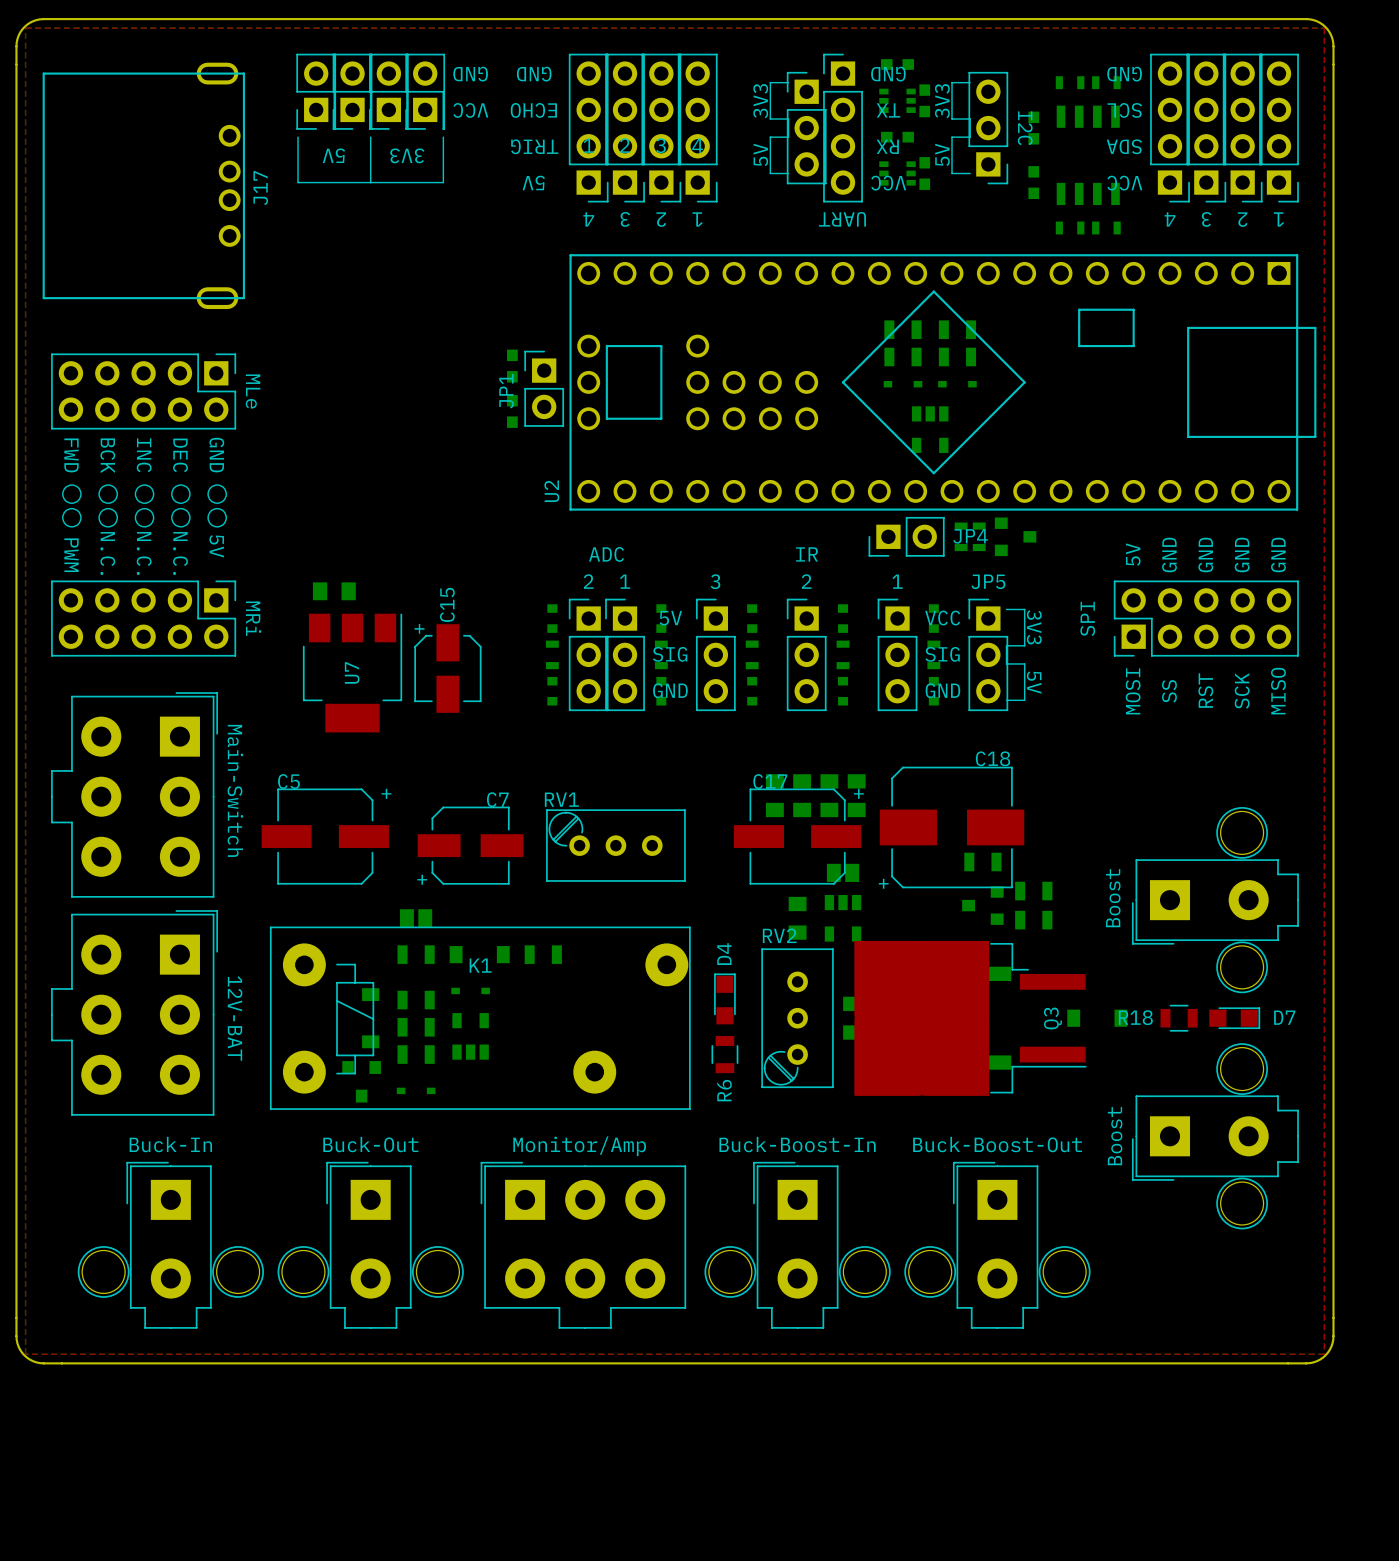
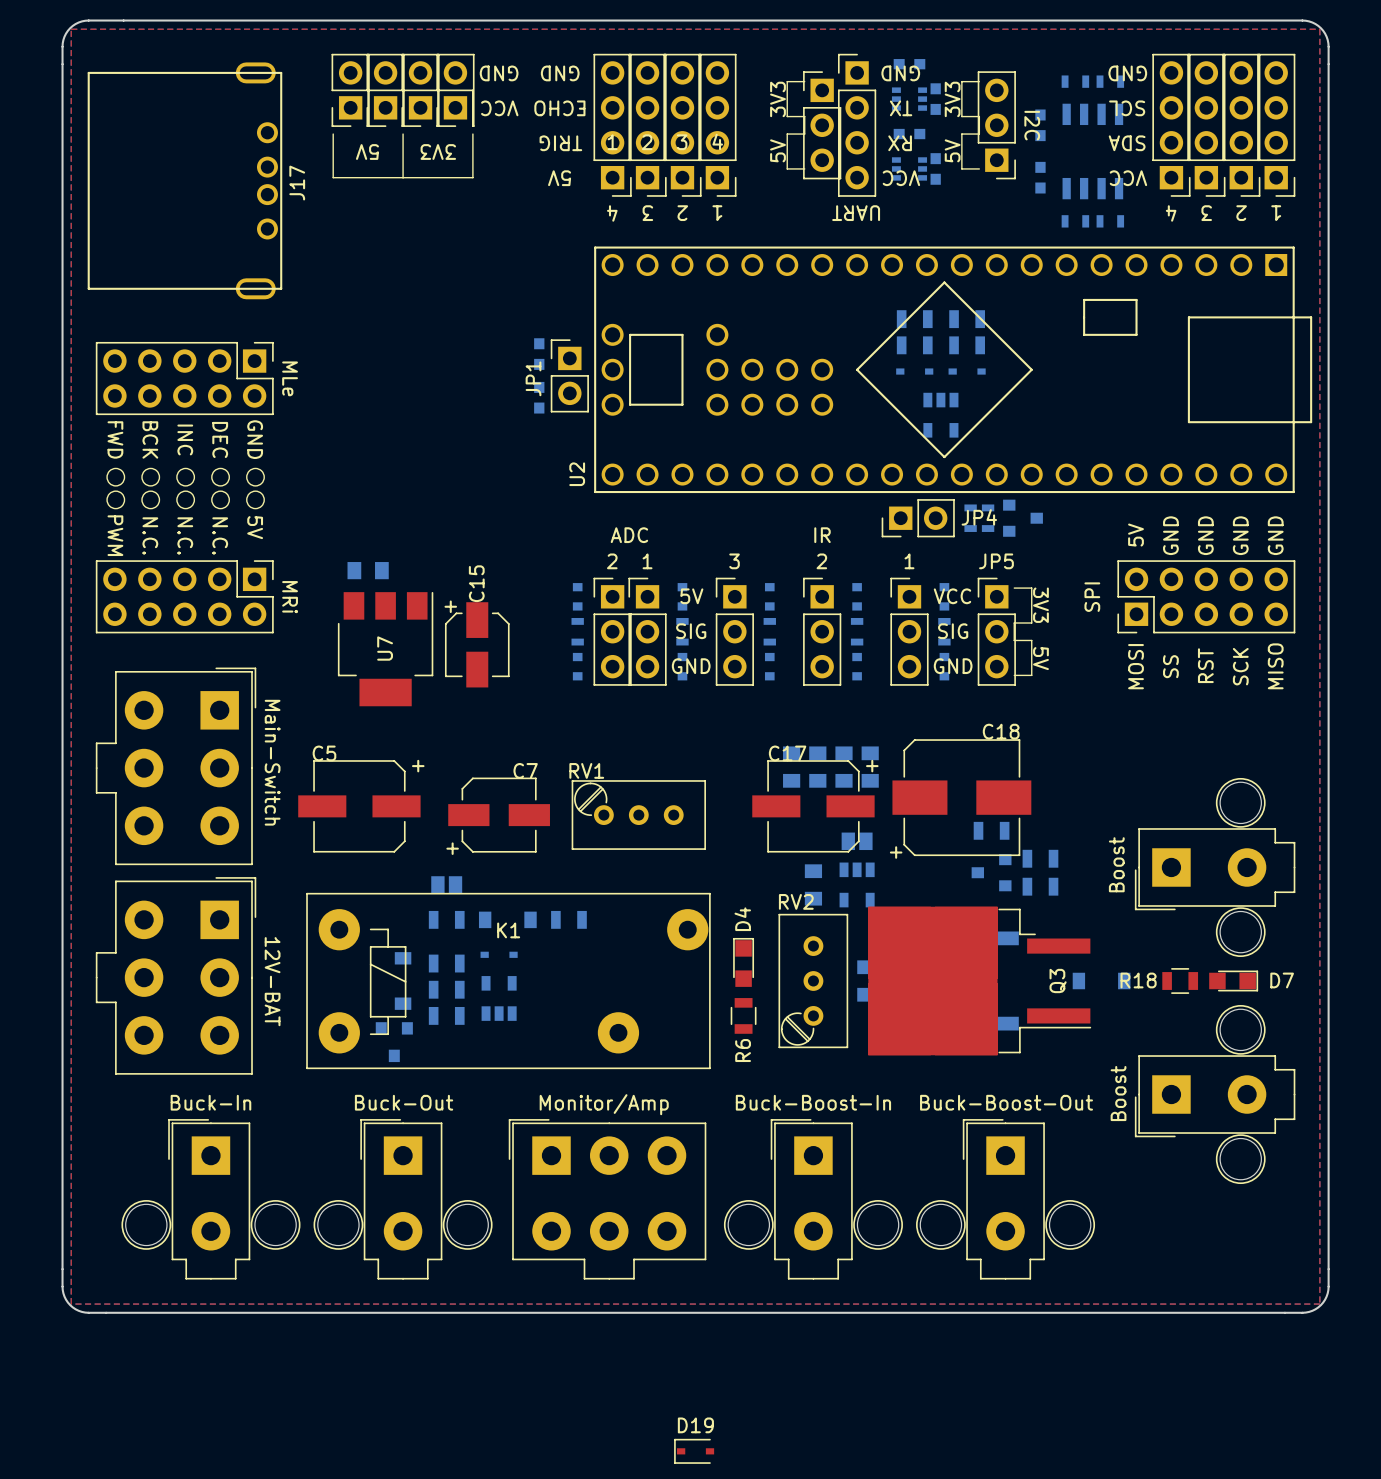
part: (416, 1090) -> none
D19: none -> (694, 1451)

